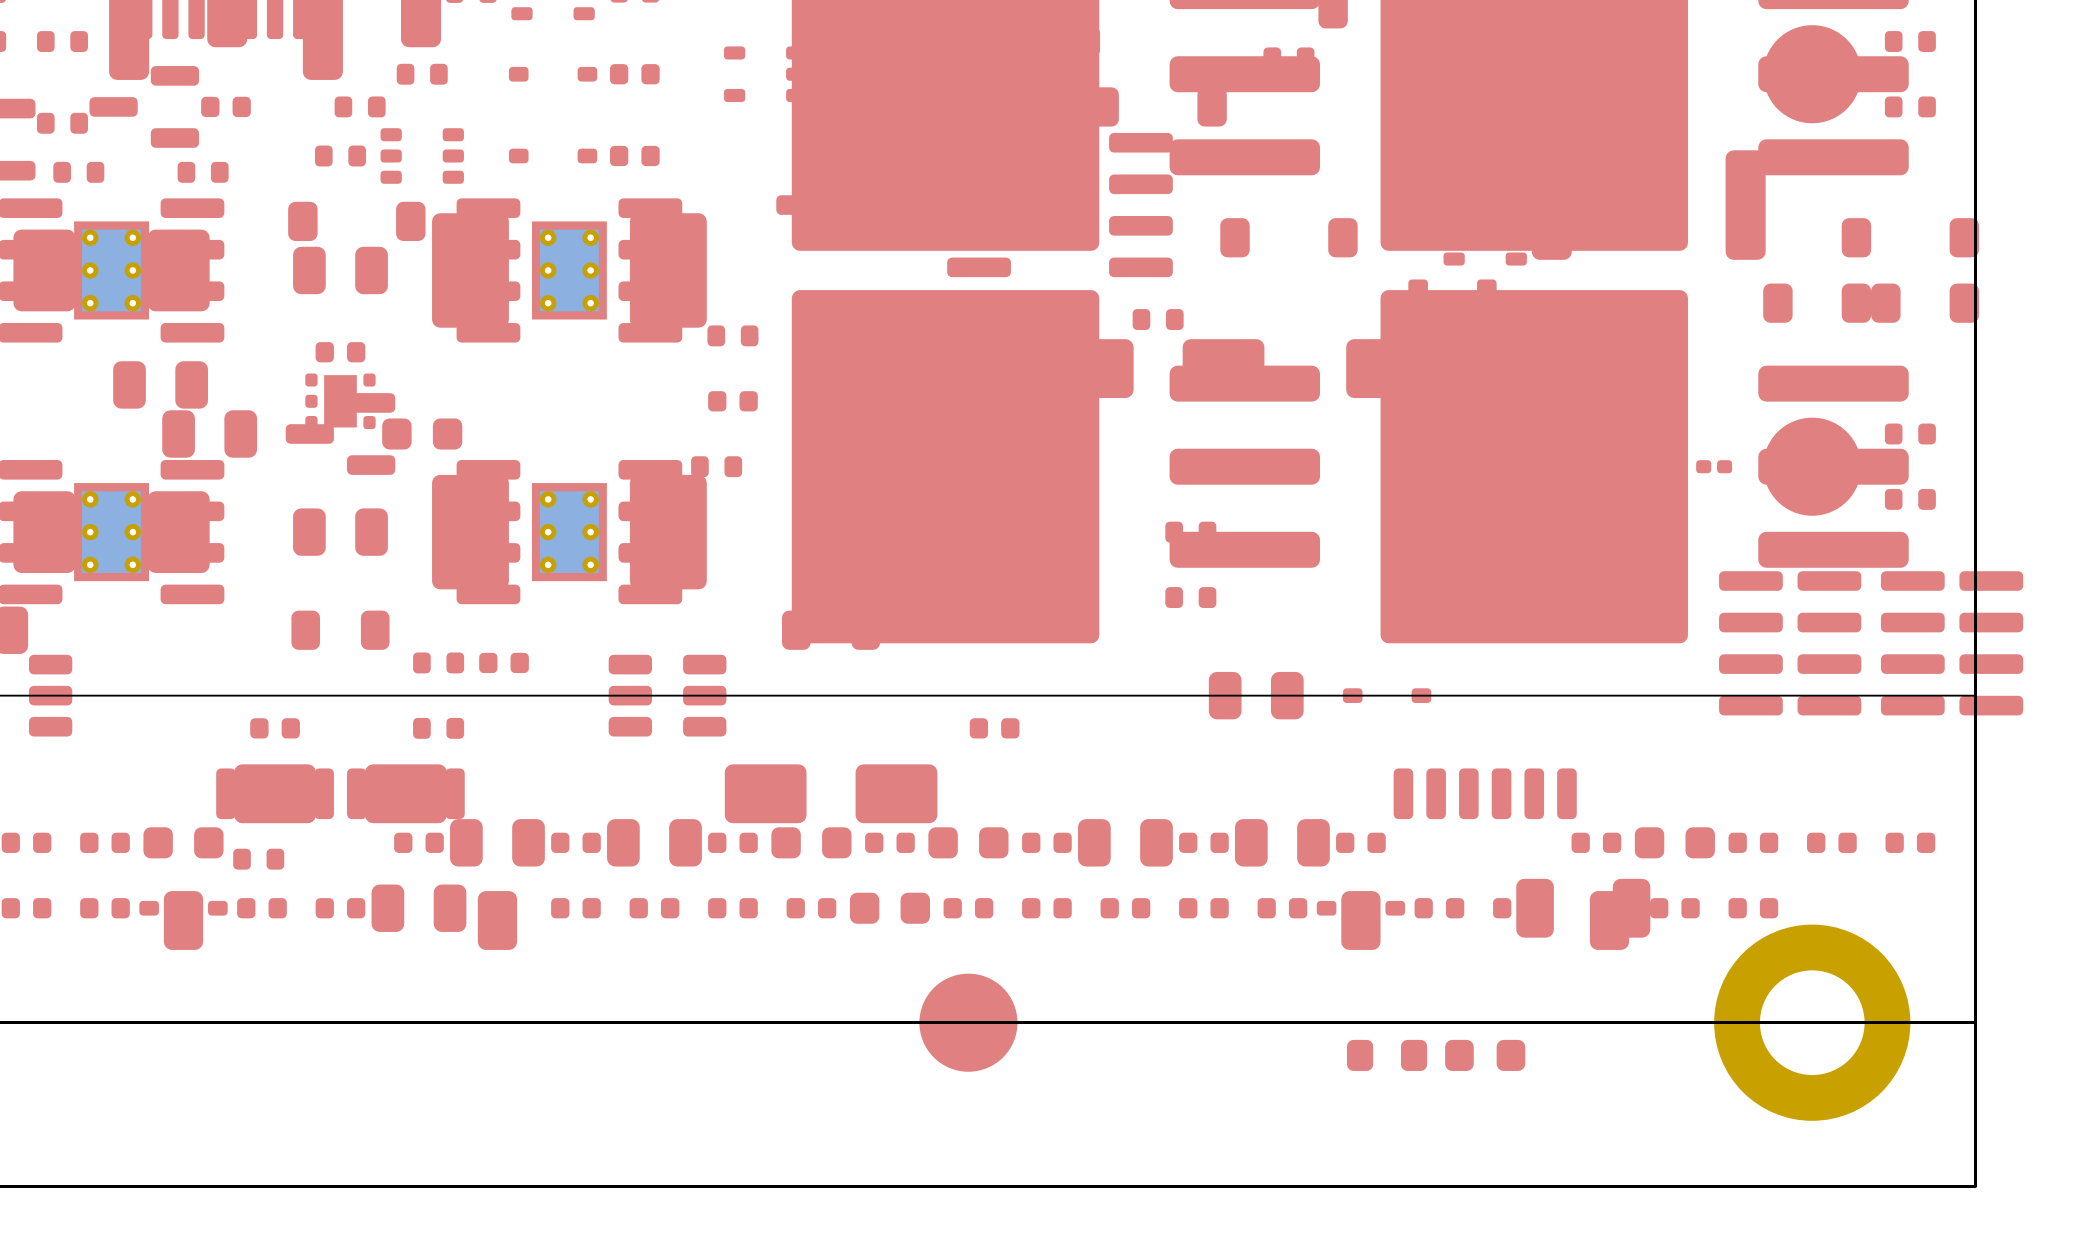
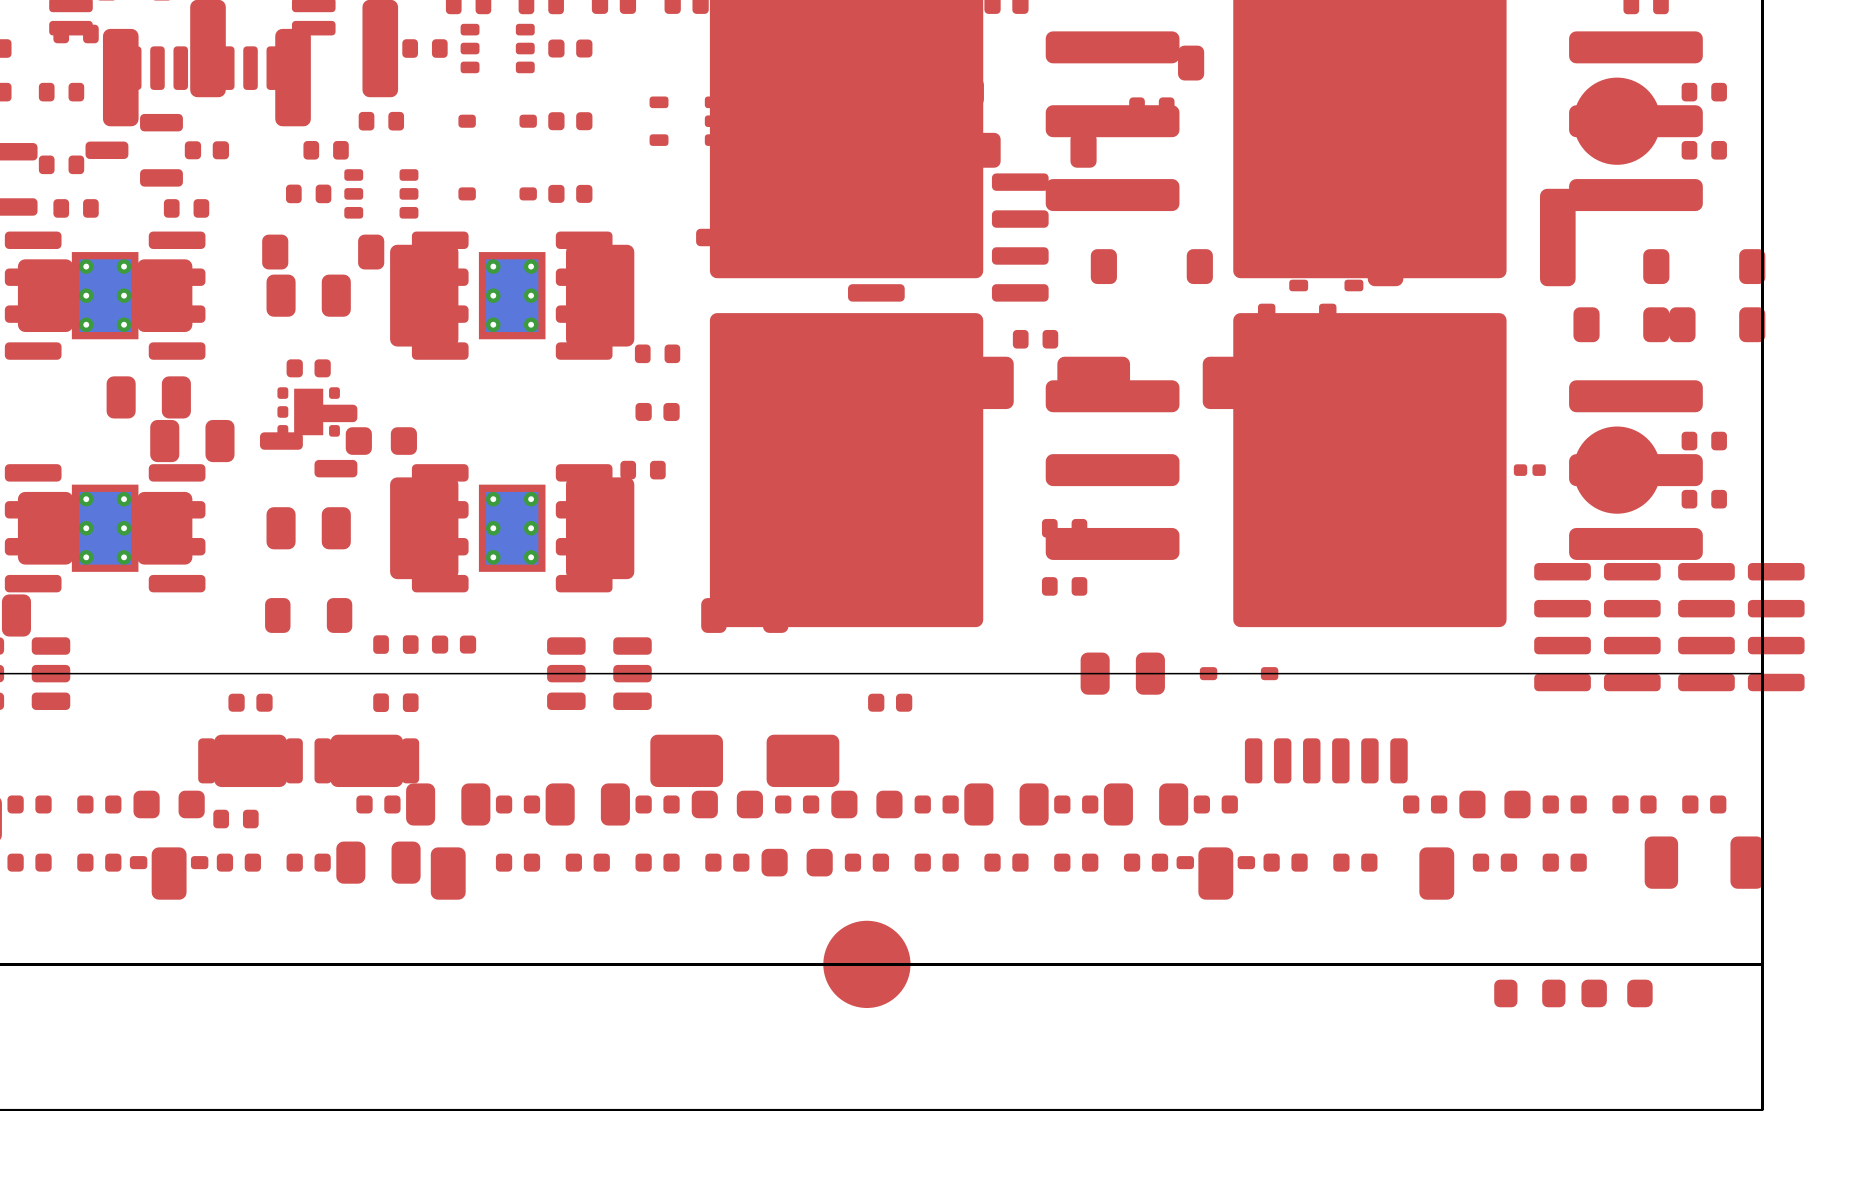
part position: (1583, 908) -> (1704, 862)
part footprint: [1714, 924, 1911, 1121] -> [1581, 979, 1653, 1008]
part position: (1387, 1055) -> (1529, 993)
part: (1485, 1055) -> none

